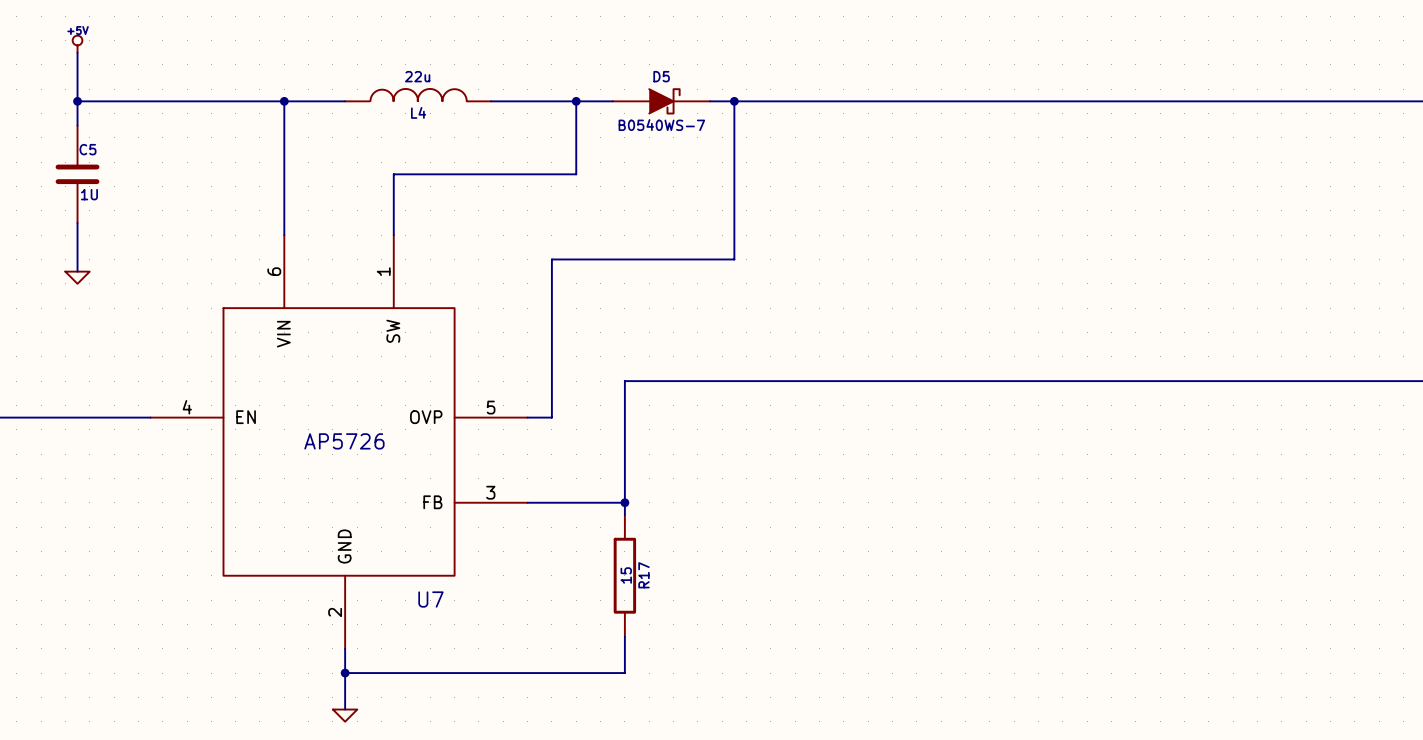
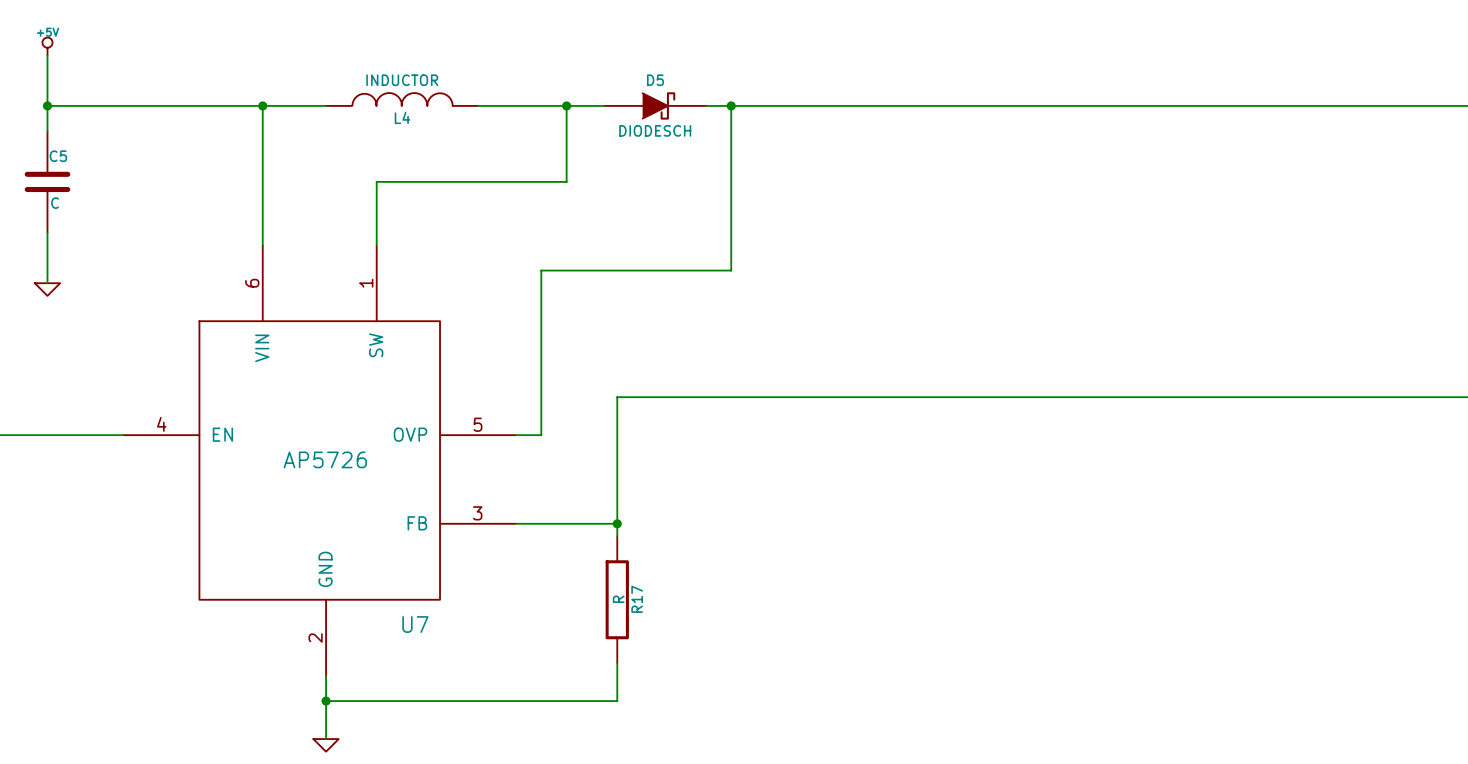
L4 value: 22u (417, 76) -> INDUCTOR (402, 80)
D5 value: B0540WS-7 (661, 125) -> DIODESCH (655, 130)
C5 value: 1U (89, 194) -> C (55, 203)
R17 value: 15 (626, 575) -> R (618, 599)

